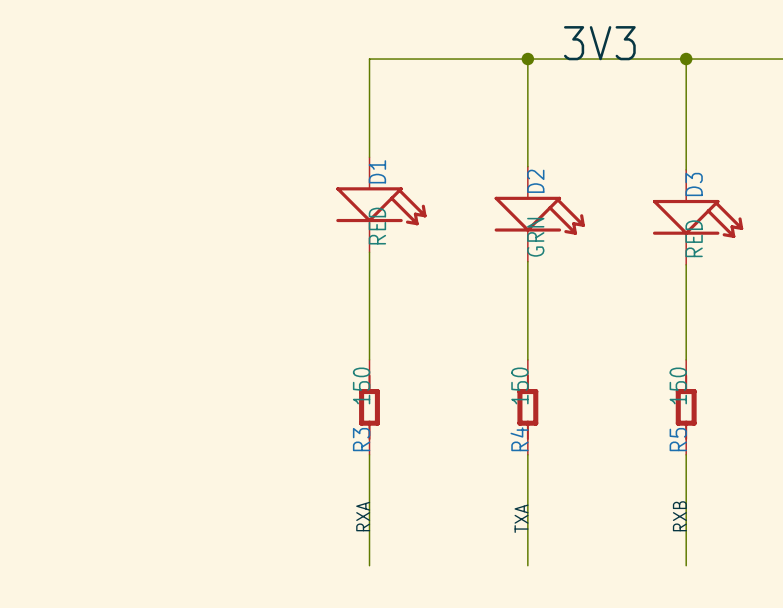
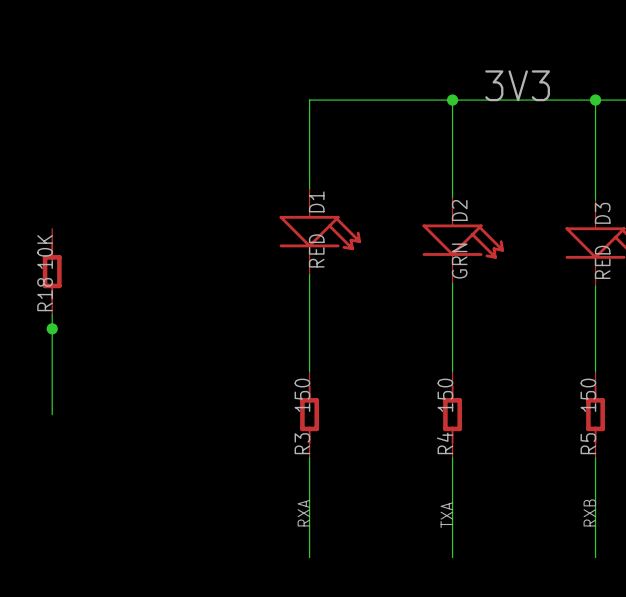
R18: none -> 10K (52, 271)
wire: none -> (52, 314) (52, 414)
junction: none -> (52, 328)

